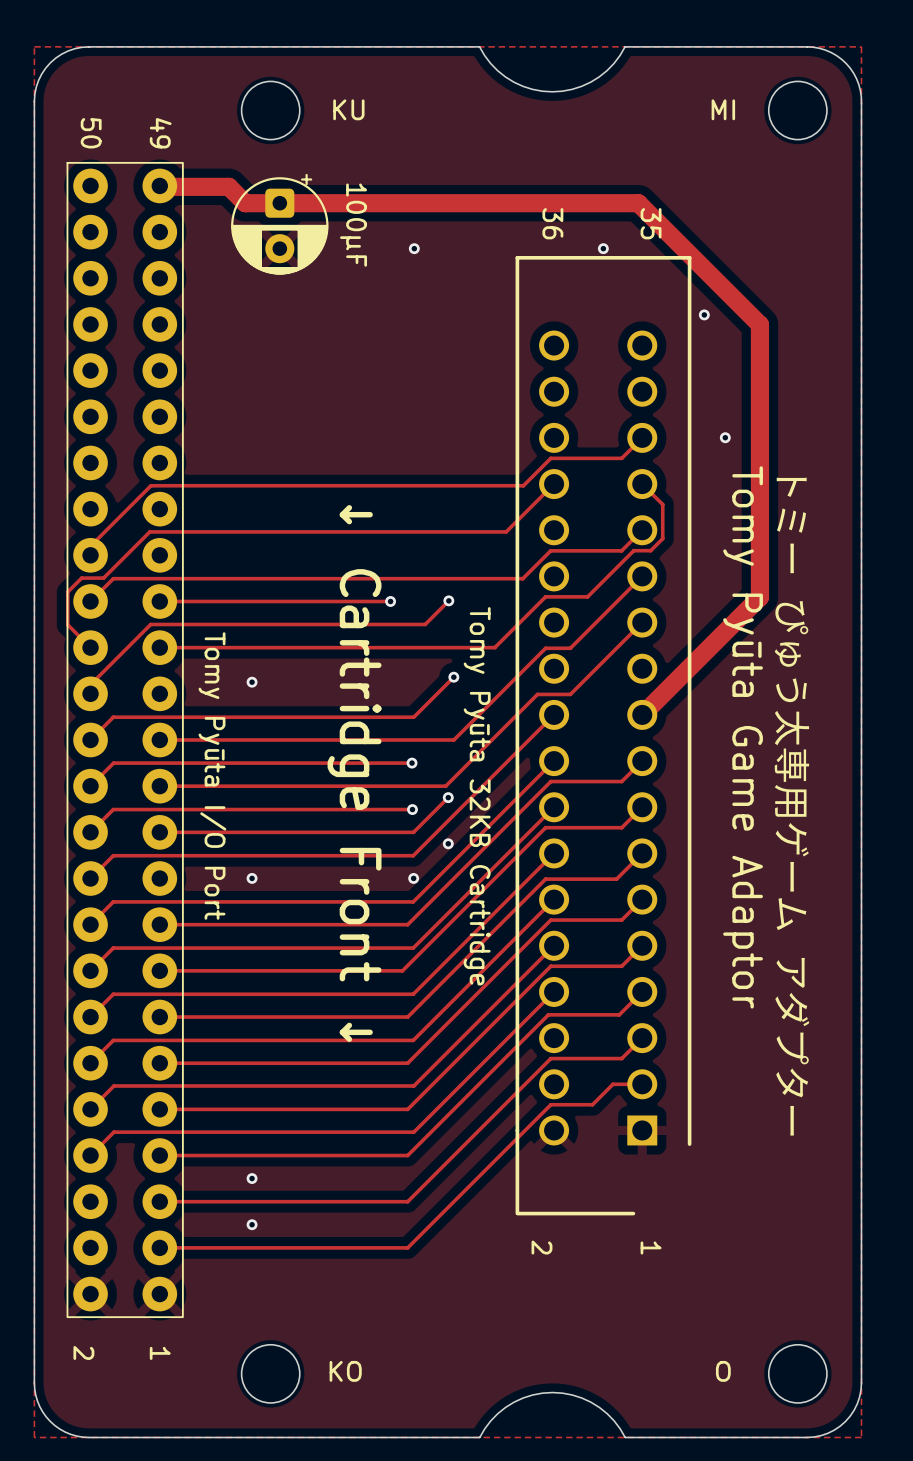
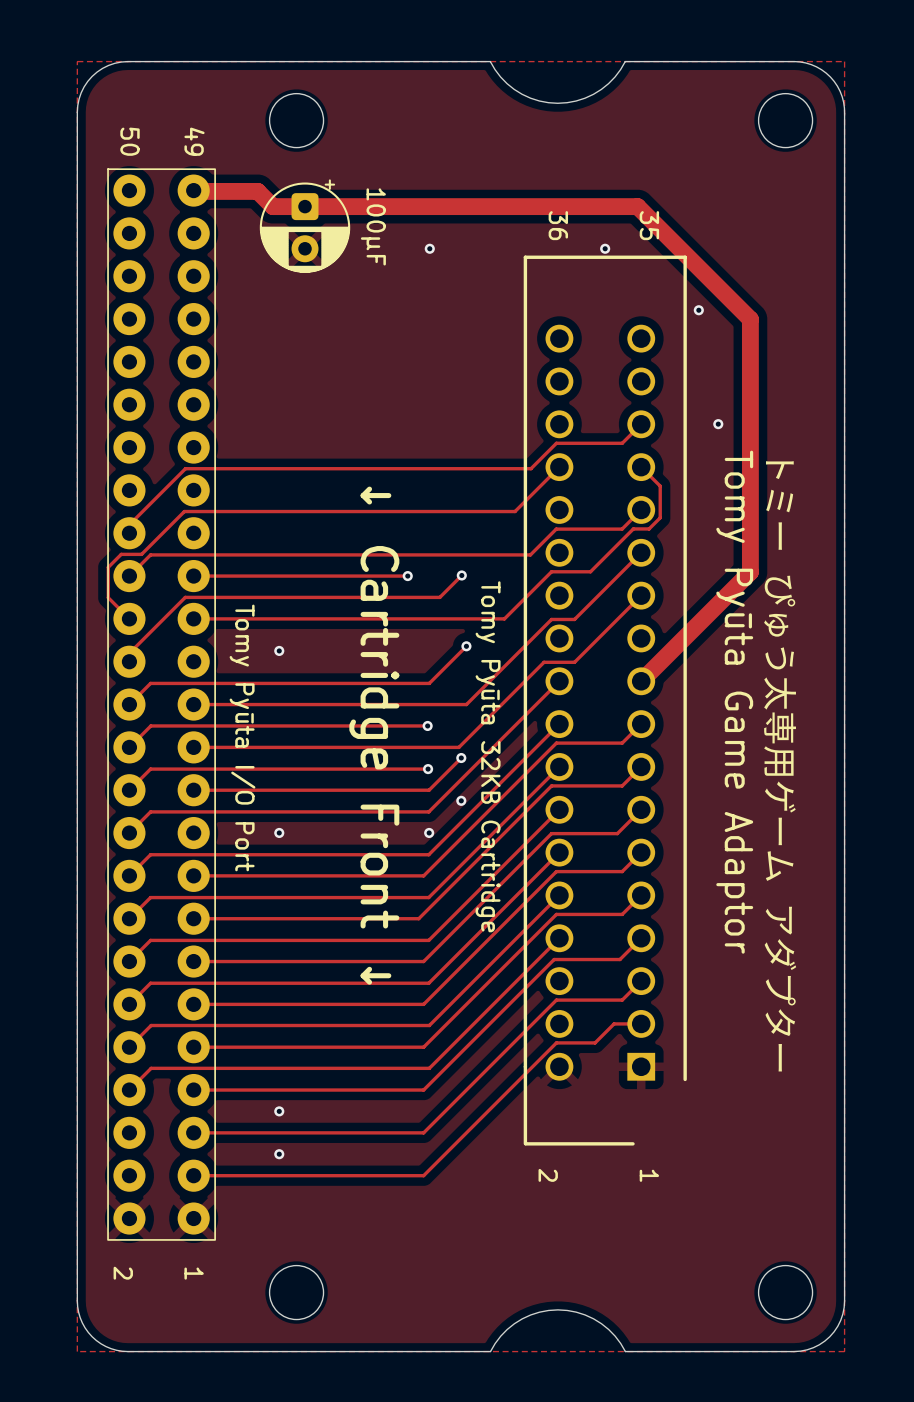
part value: KU (348, 109) -> none
part value: MI (723, 109) -> none
part value: KO (345, 1371) -> none
part value: O (723, 1371) -> none

